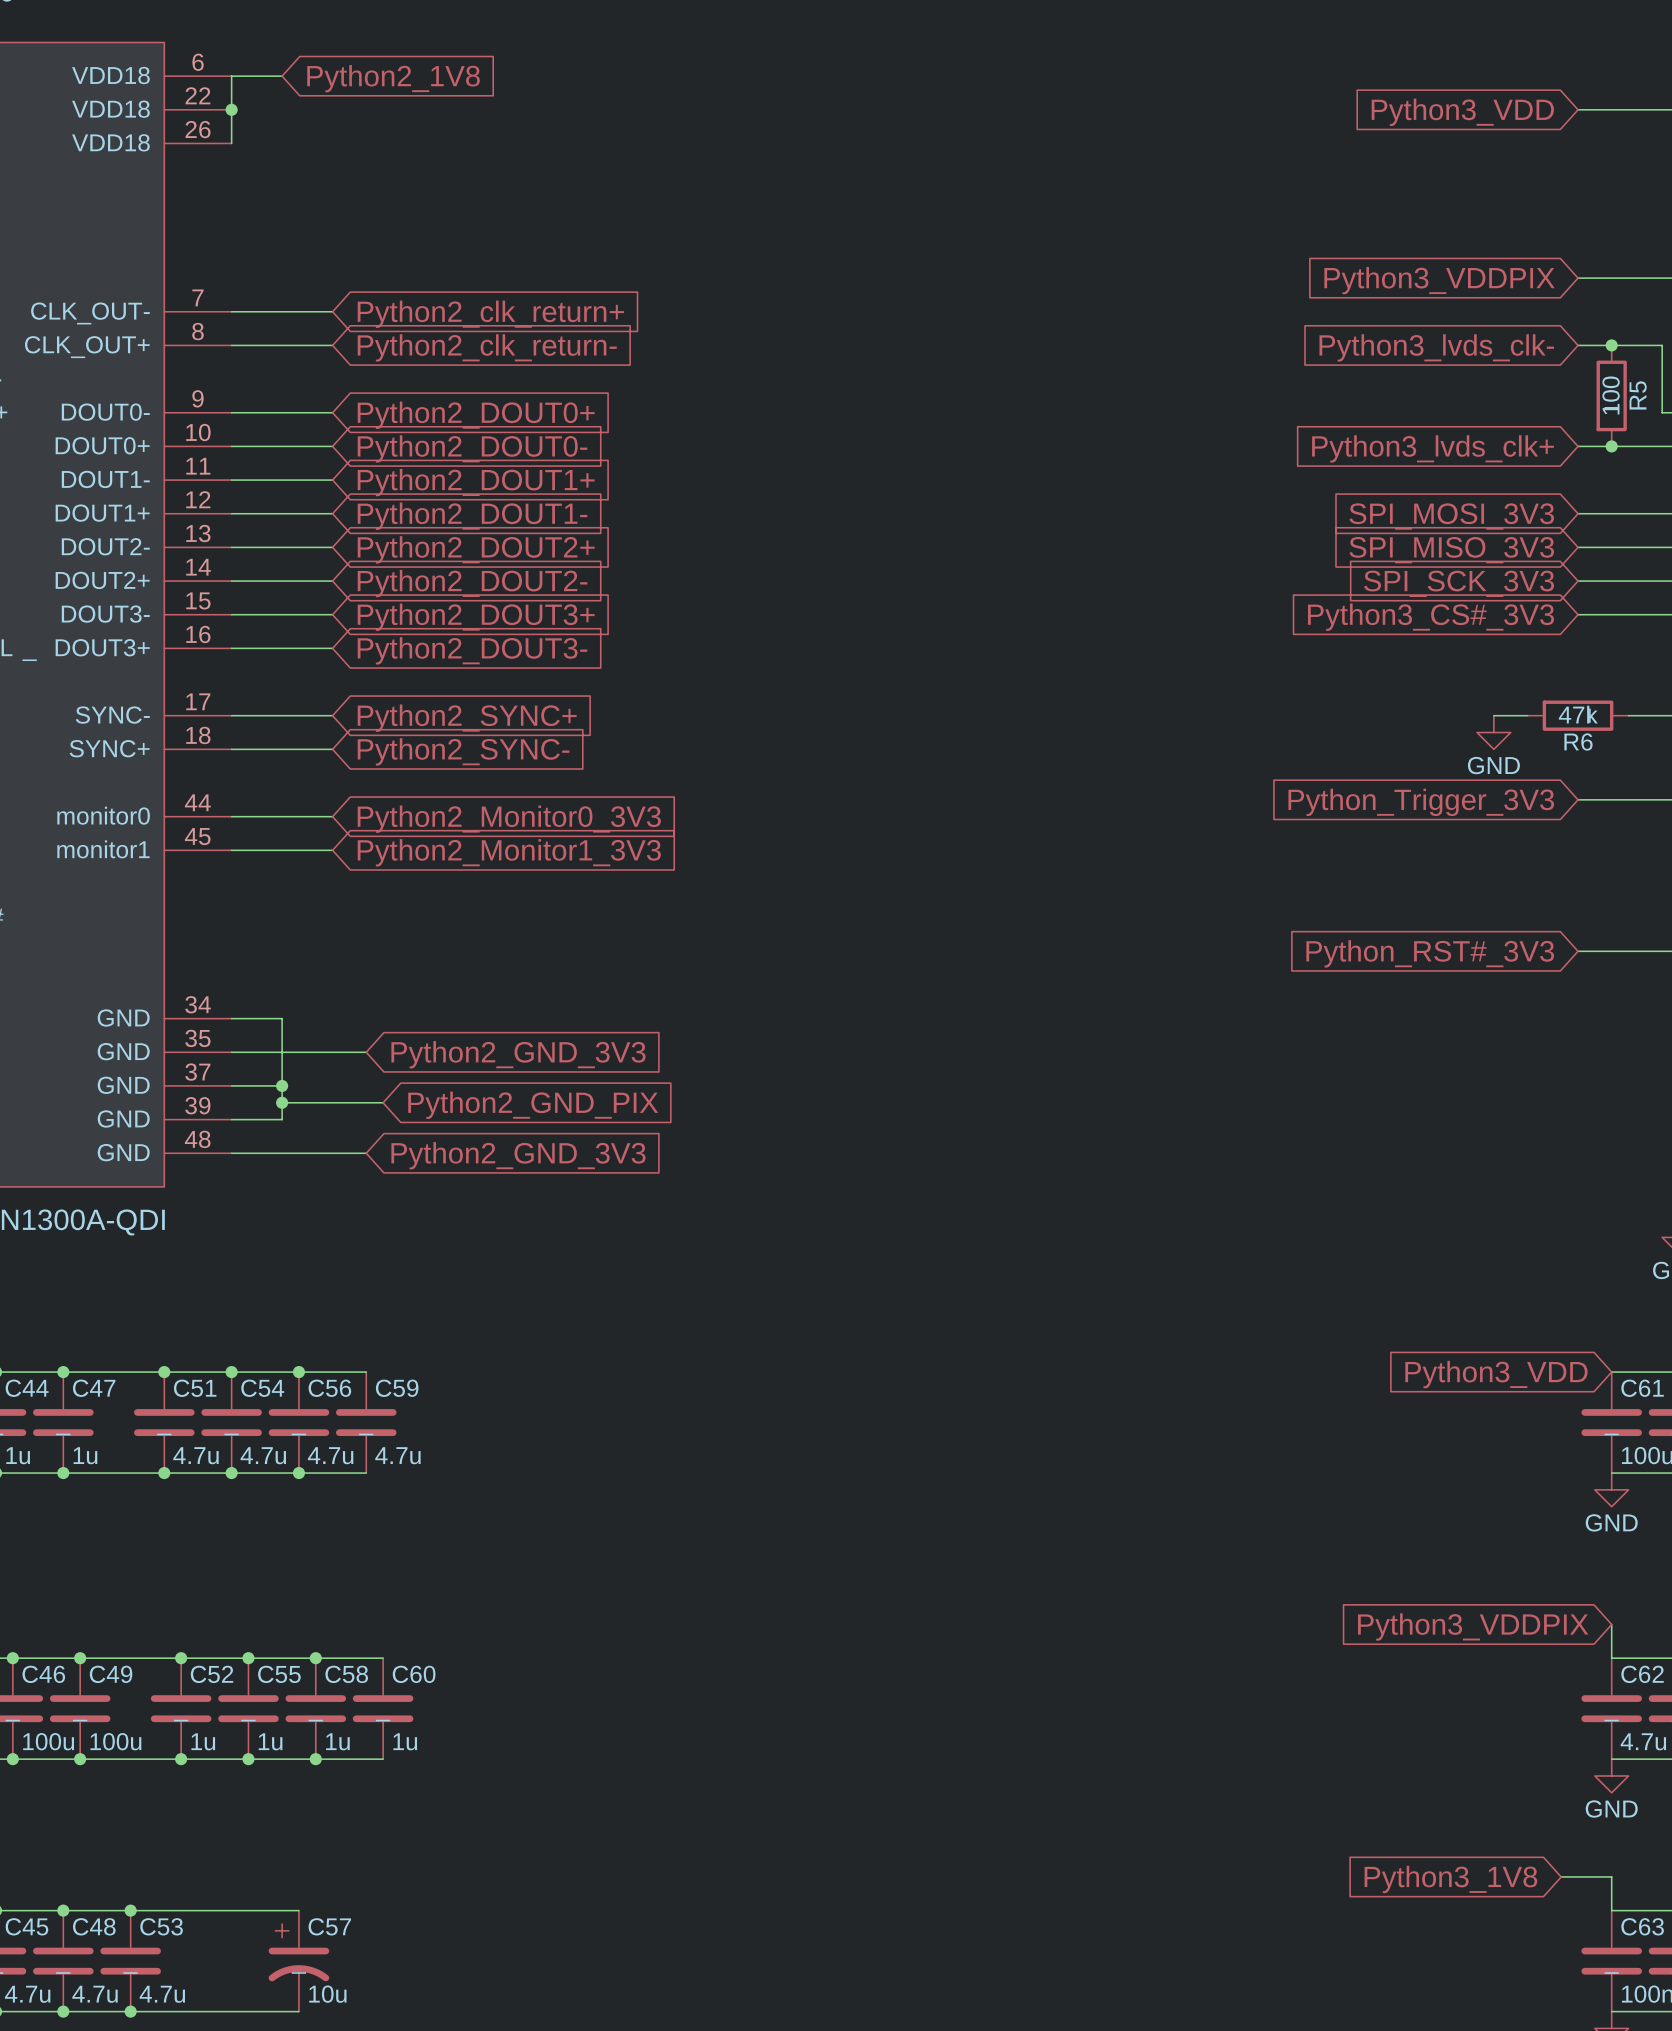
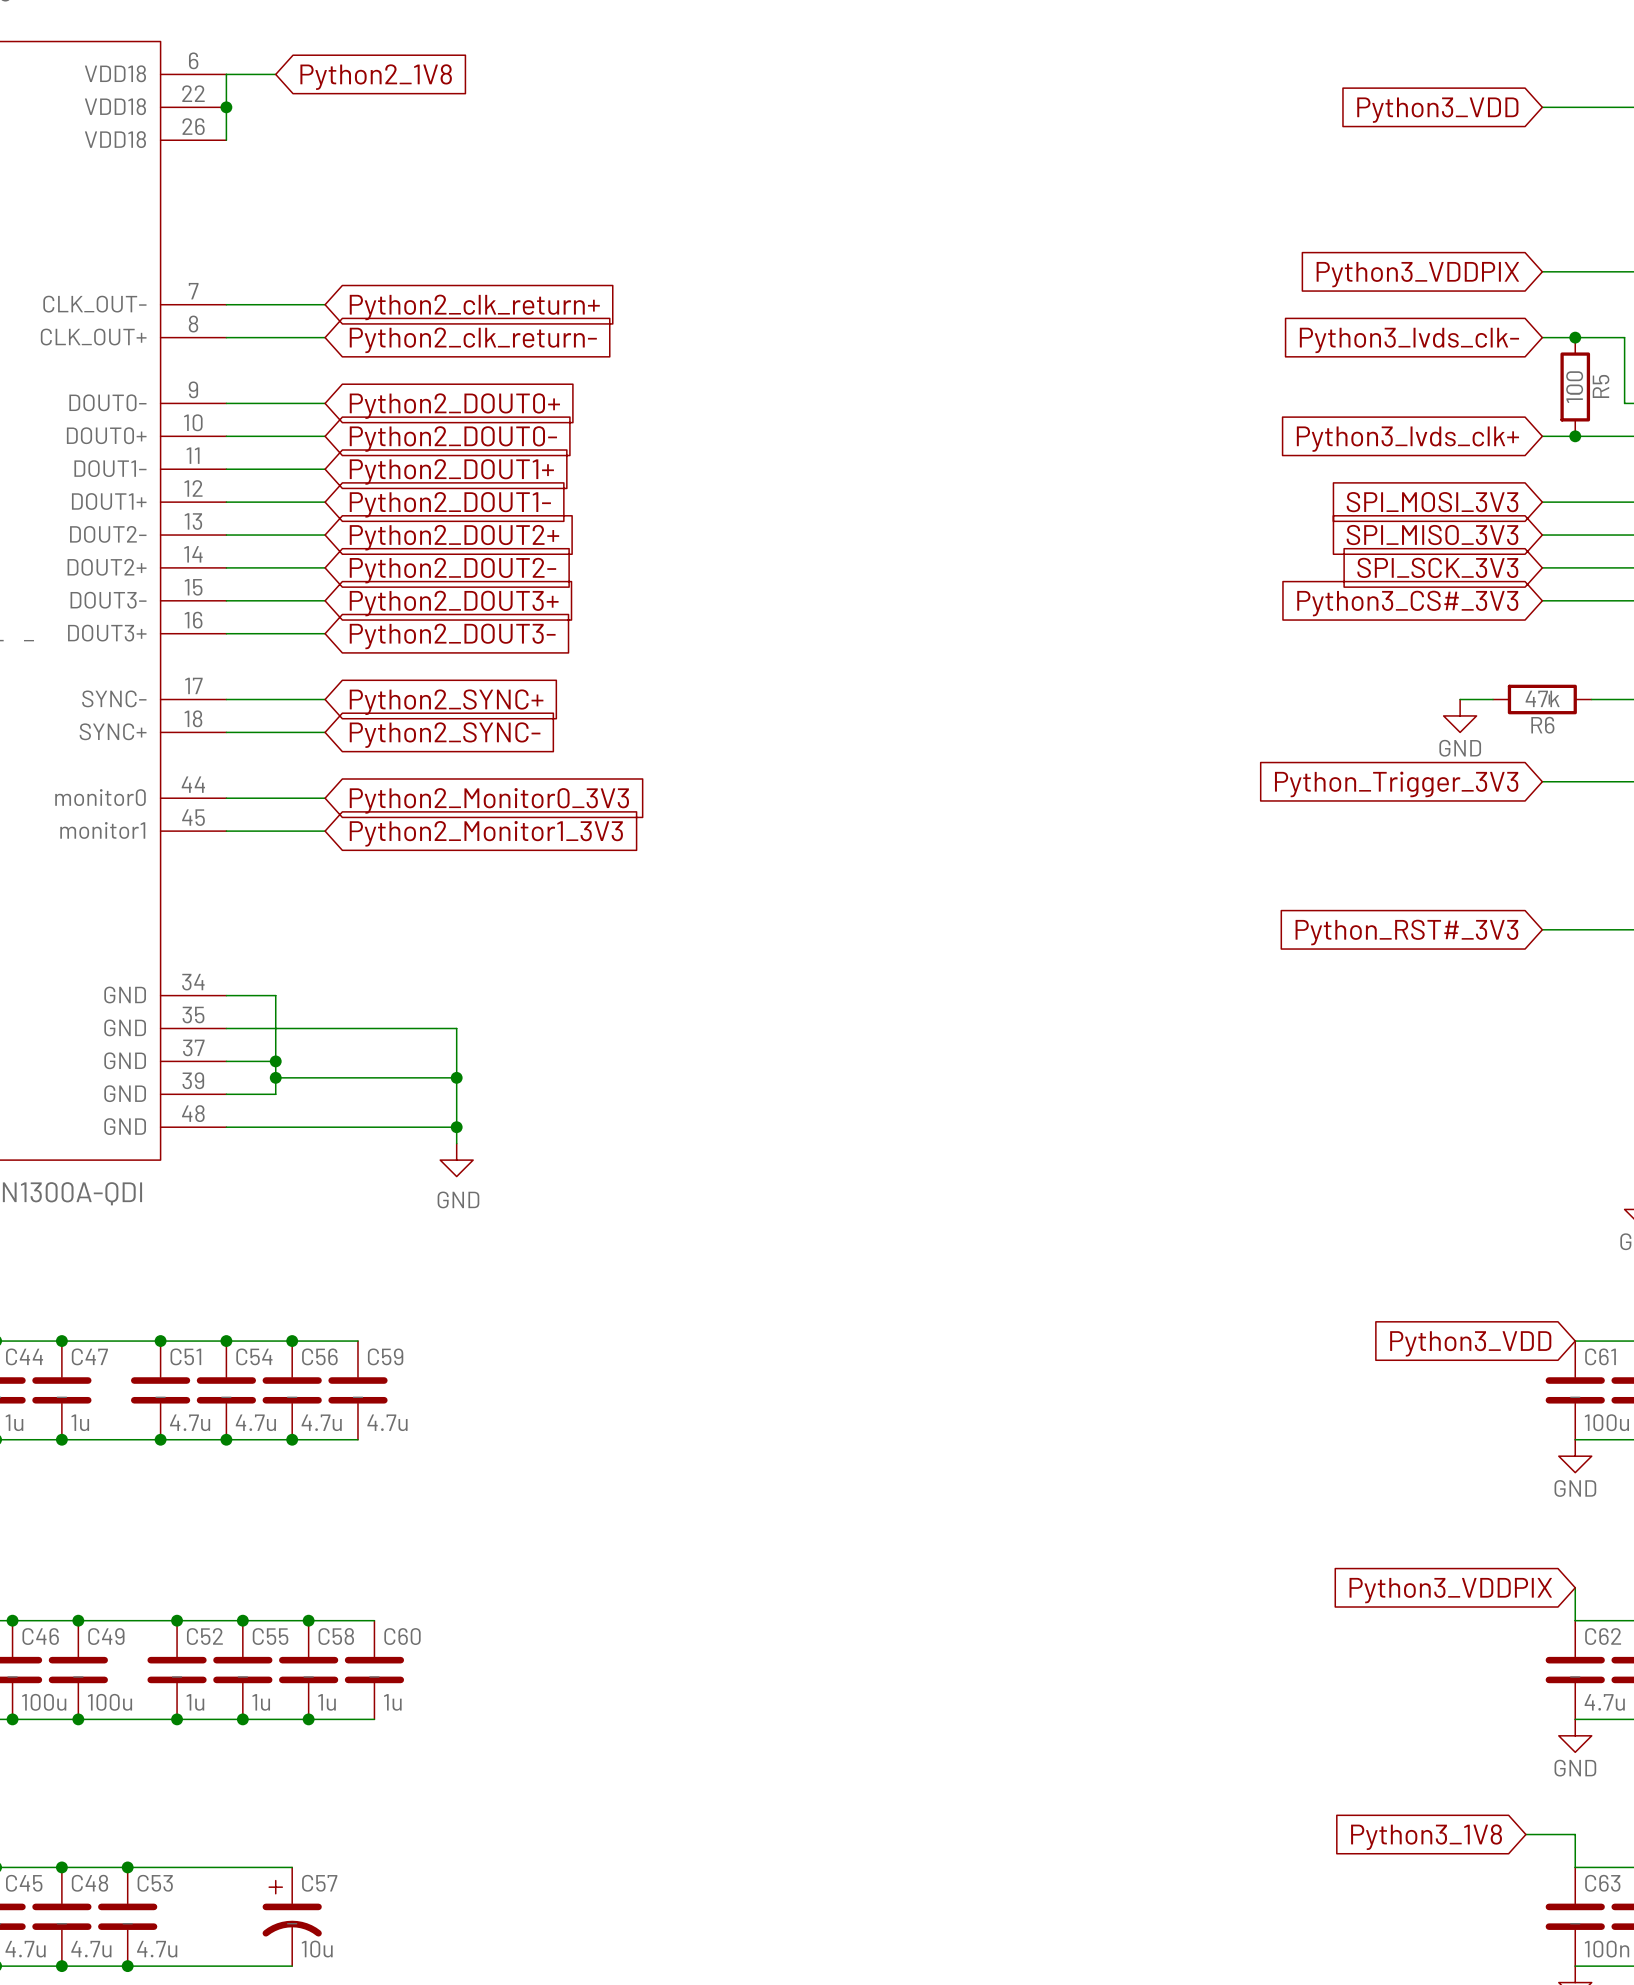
wire: none -> (357, 1028) (456, 1028) (456, 1143)
global label: Python2_GND_3V3 (518, 1054) -> none
wire: none -> (374, 1077) (456, 1077)
junction: none -> (456, 1077)
global label: Python2_GND_PIX (533, 1105) -> none
wire: none -> (357, 1127) (456, 1127)
junction: none -> (456, 1127)
global label: Python2_GND_3V3 (518, 1155) -> none
power symbol: none -> GND (456, 1160)

